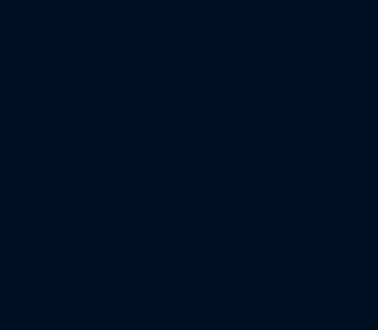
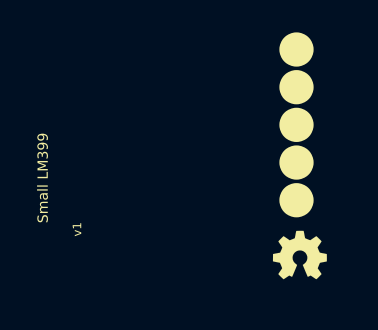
drawing: none -> [272, 32, 327, 280]
text: none -> Small LM399 (42, 177)
text: none -> v1 (76, 229)

